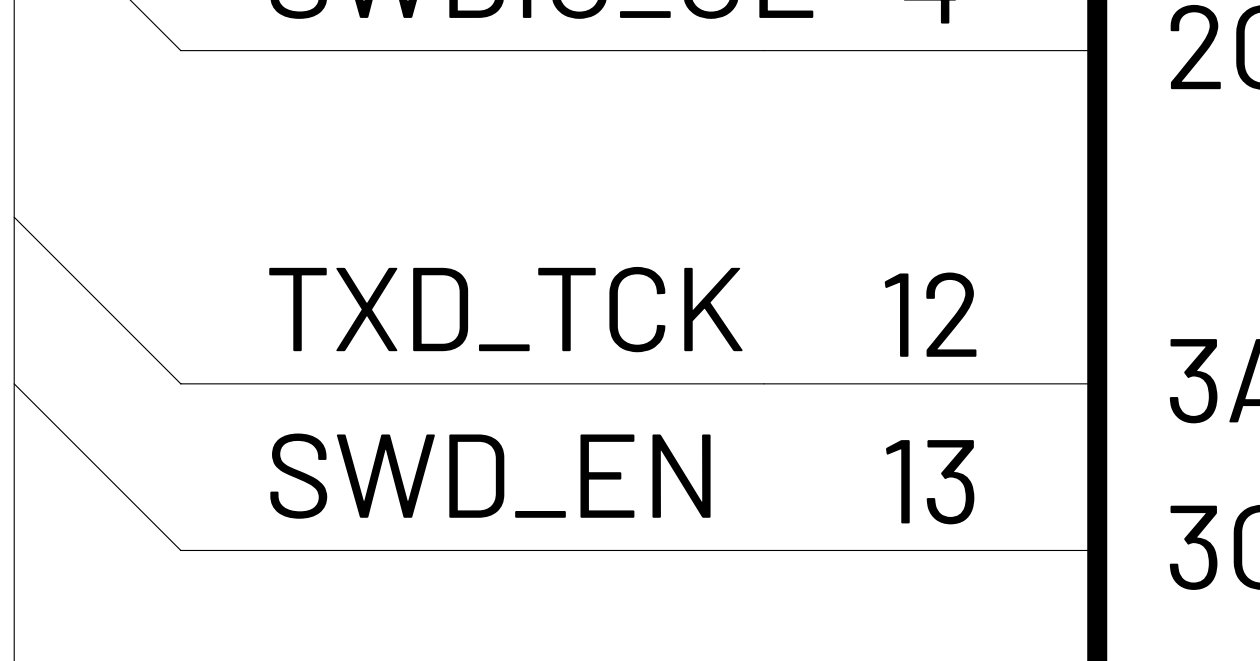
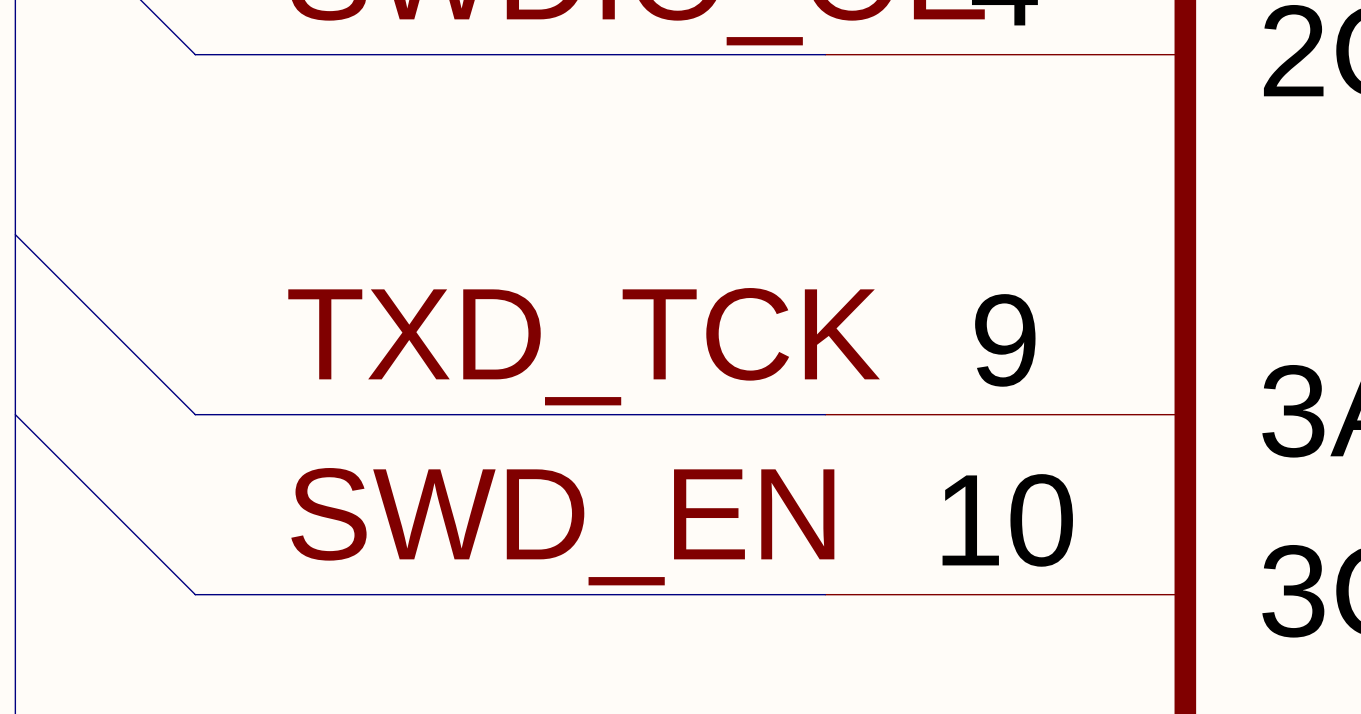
part pin number: 12 (930, 314) -> 9 (1005, 340)
part pin number: 13 (930, 482) -> 10 (1007, 520)

